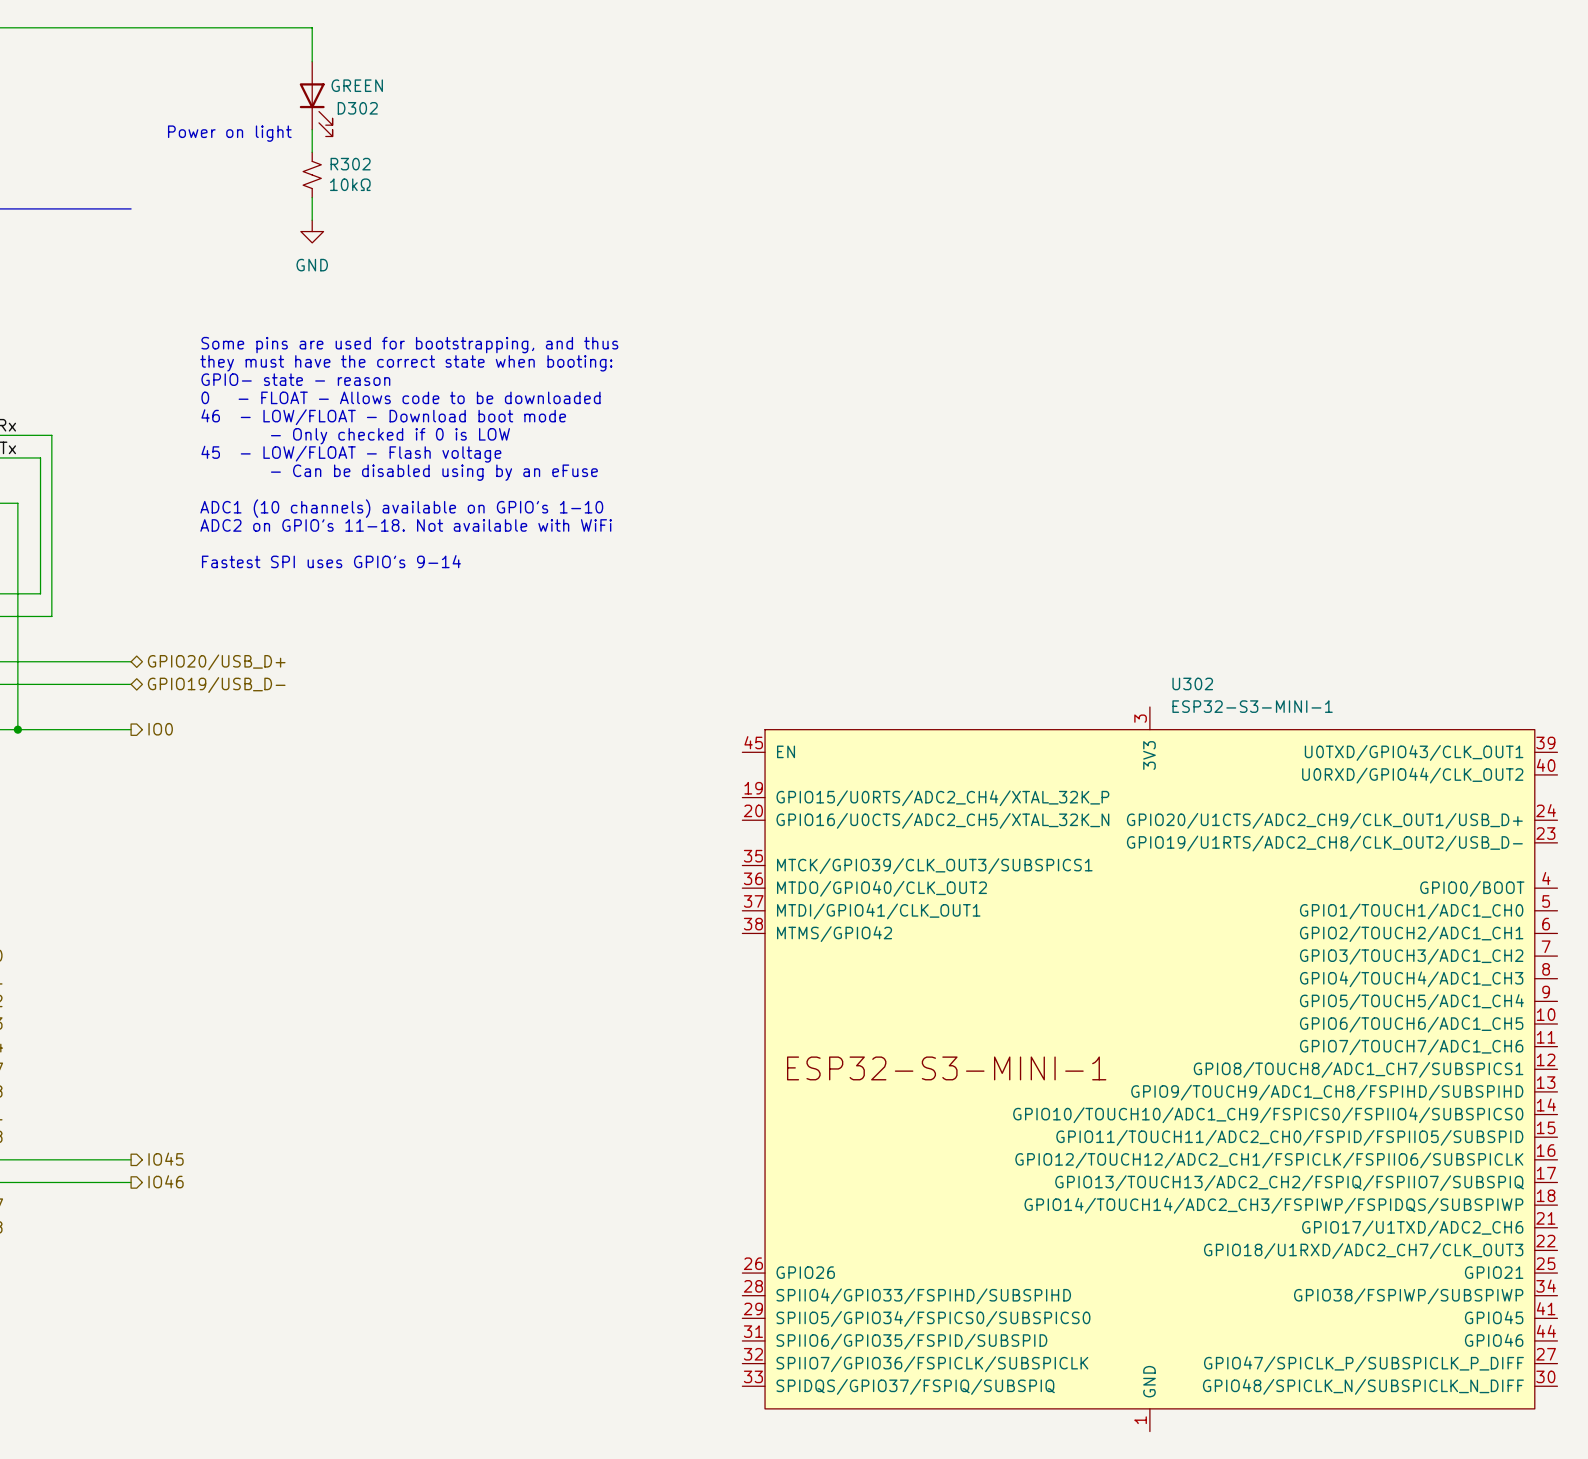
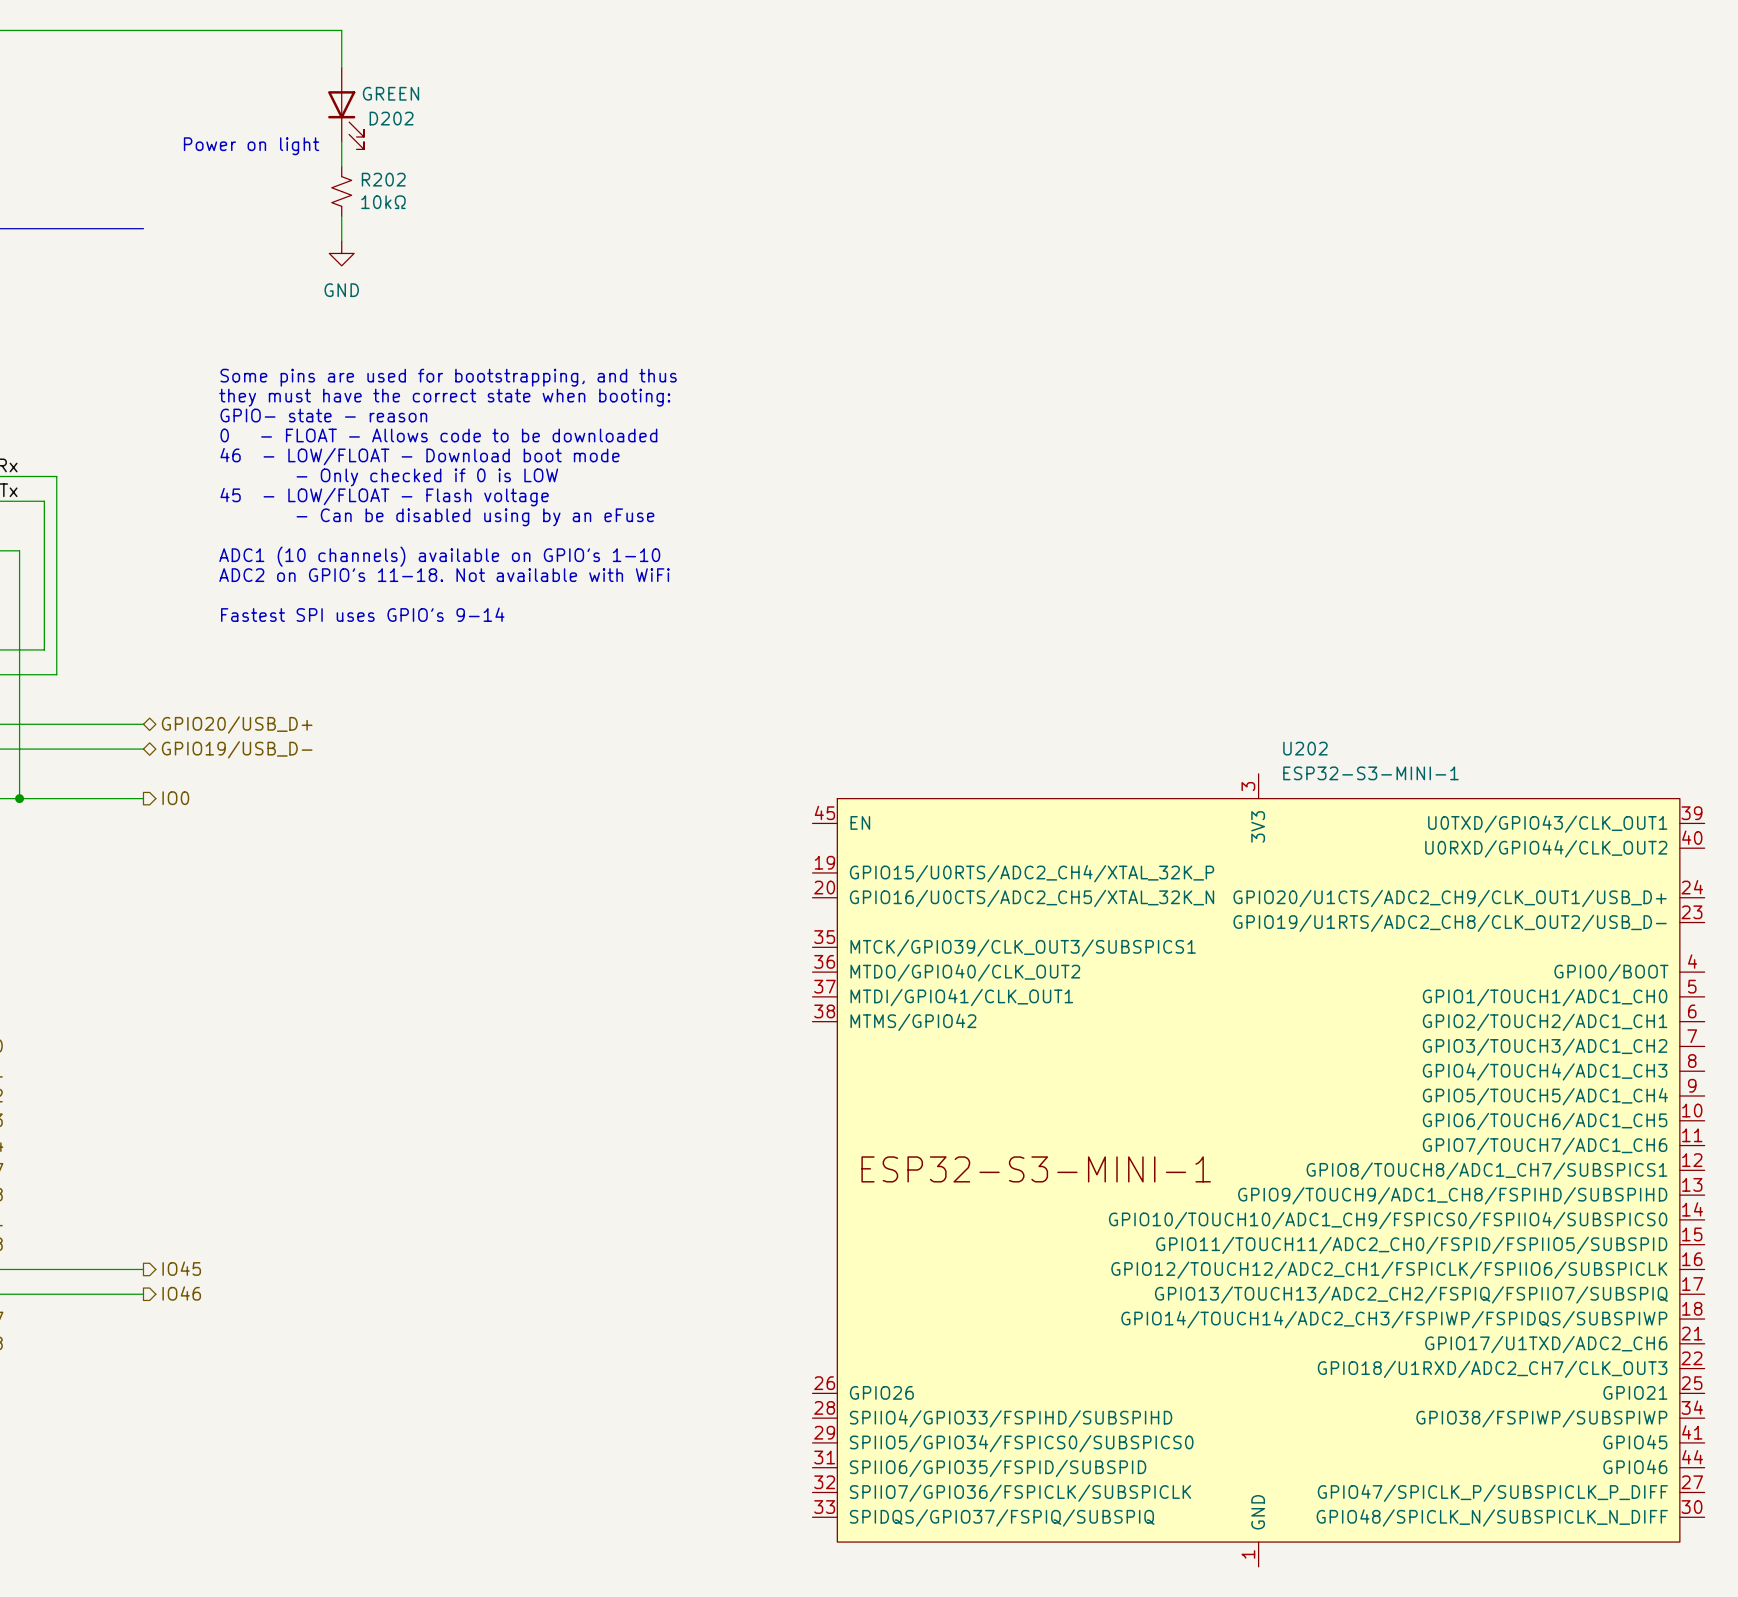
D302 name: D302 (357, 108) -> D202 (391, 118)
R302 name: R302 (350, 164) -> R202 (383, 179)
U302 name: U302 (1192, 683) -> U202 (1305, 748)

